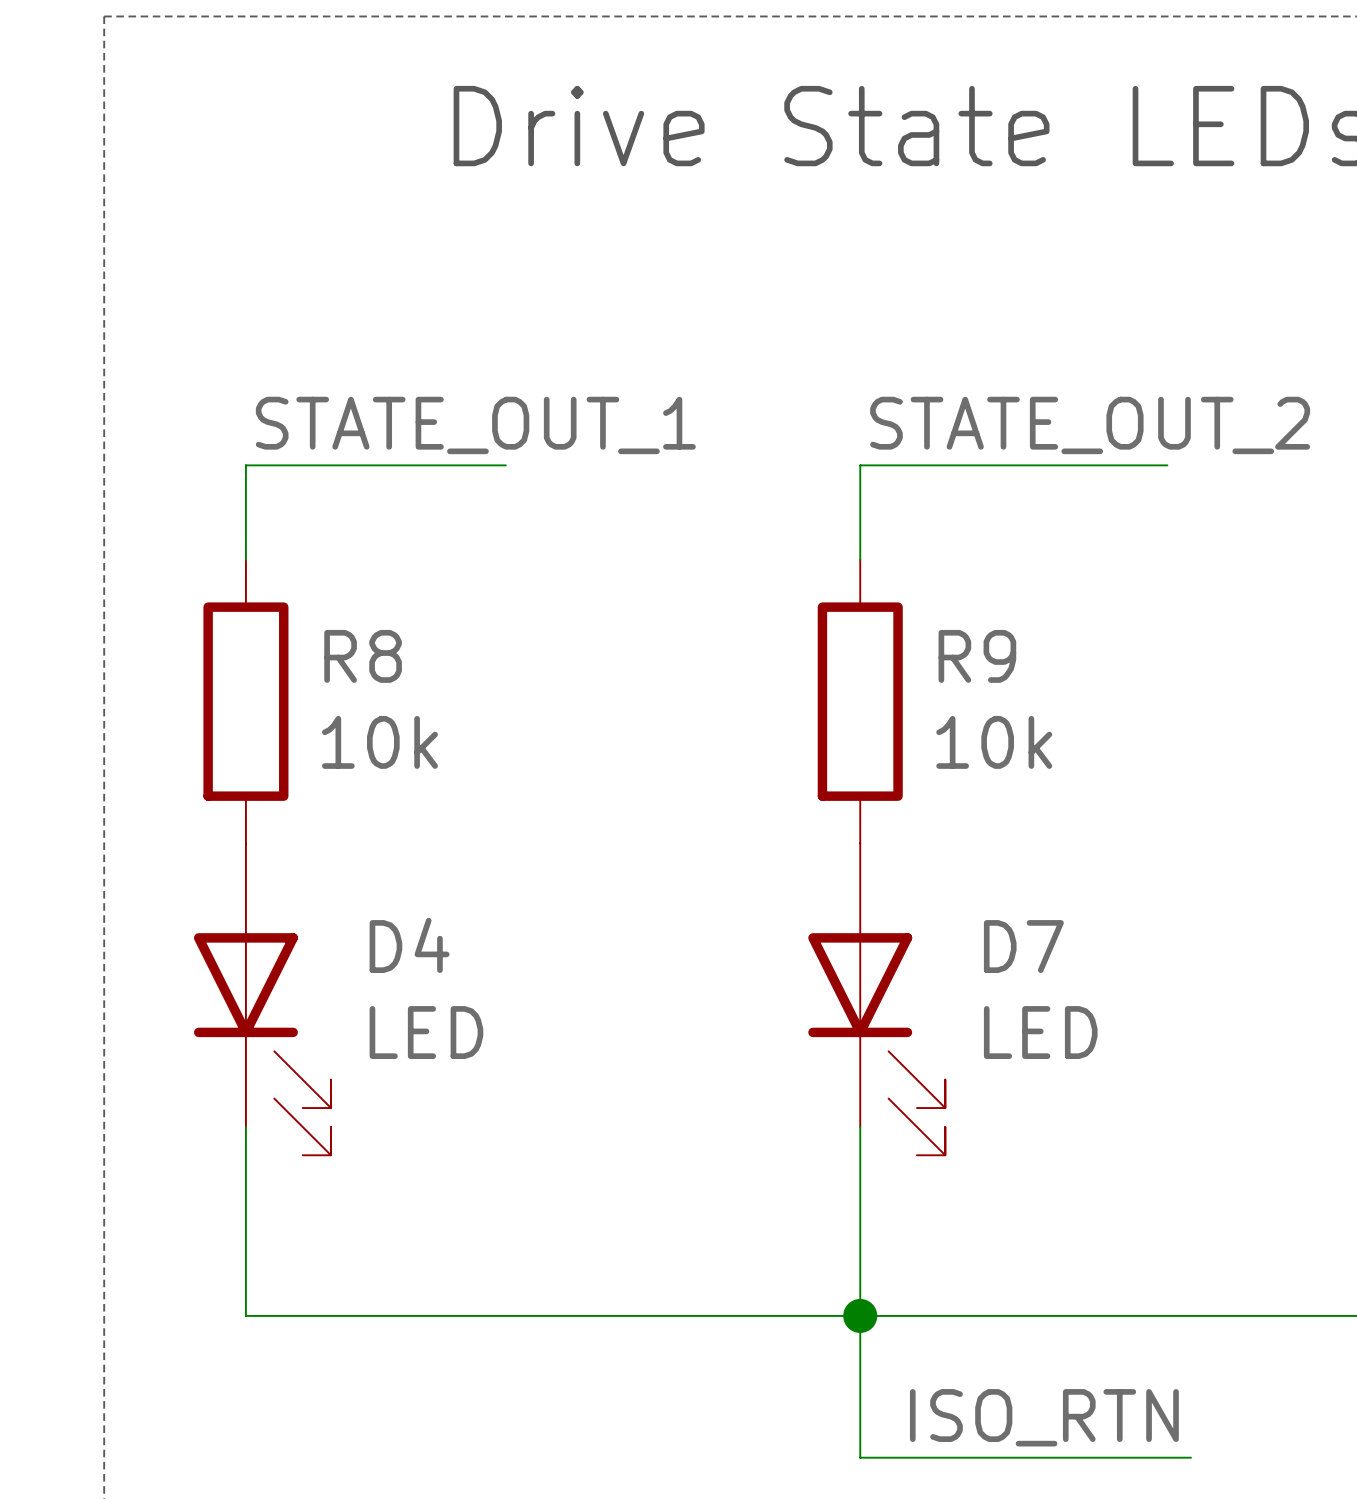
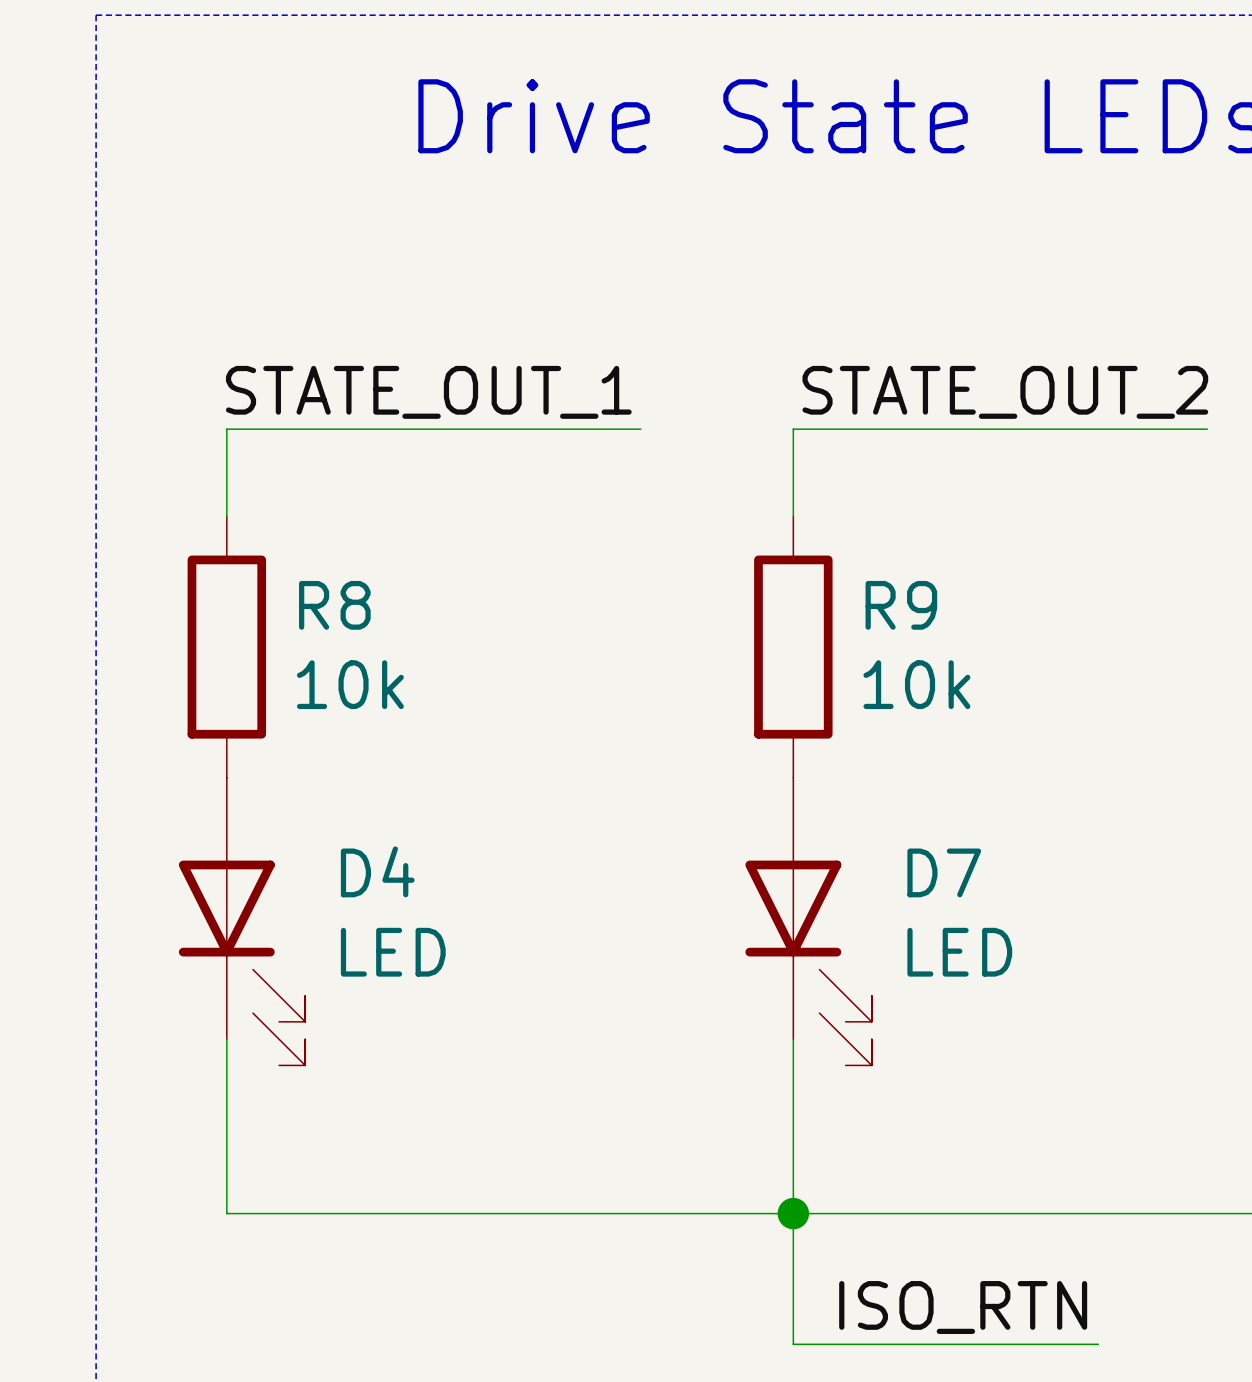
label position: STATE_OUT_1 (475, 425) -> STATE_OUT_1 (428, 392)
wire: none -> (466, 429) (640, 429)
wire: none -> (1076, 429) (1207, 429)

